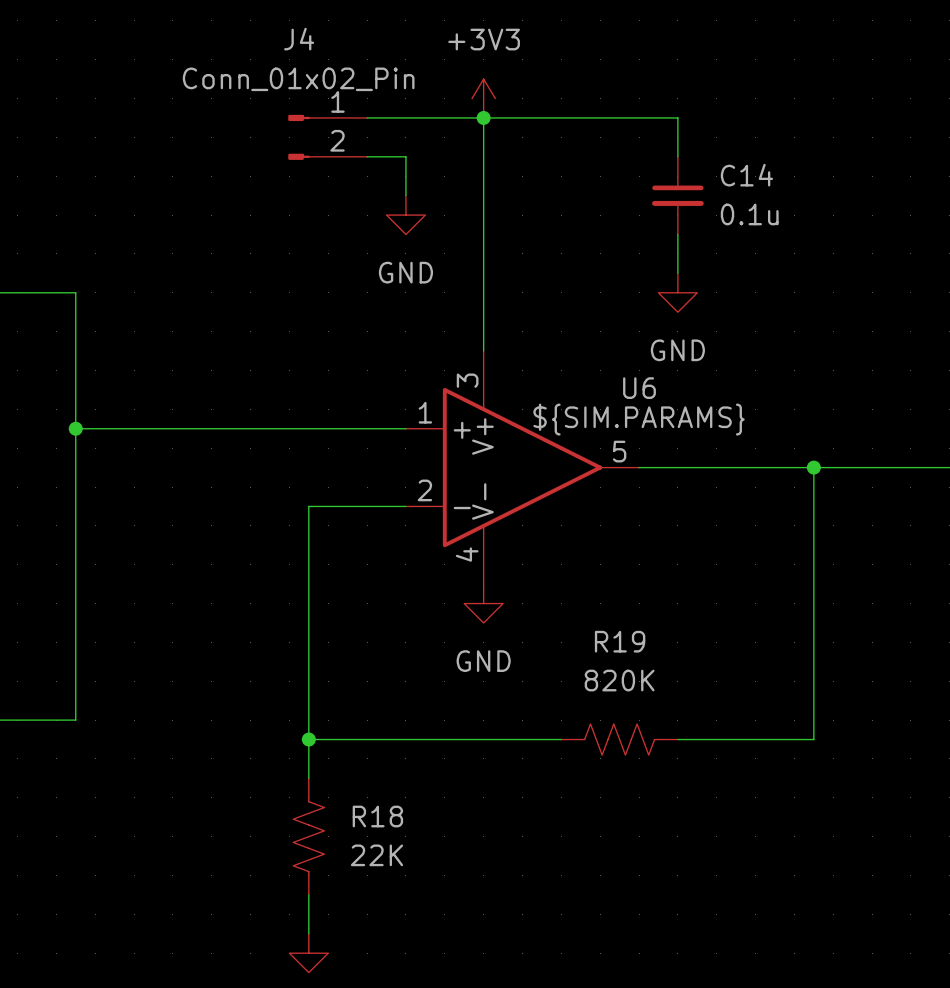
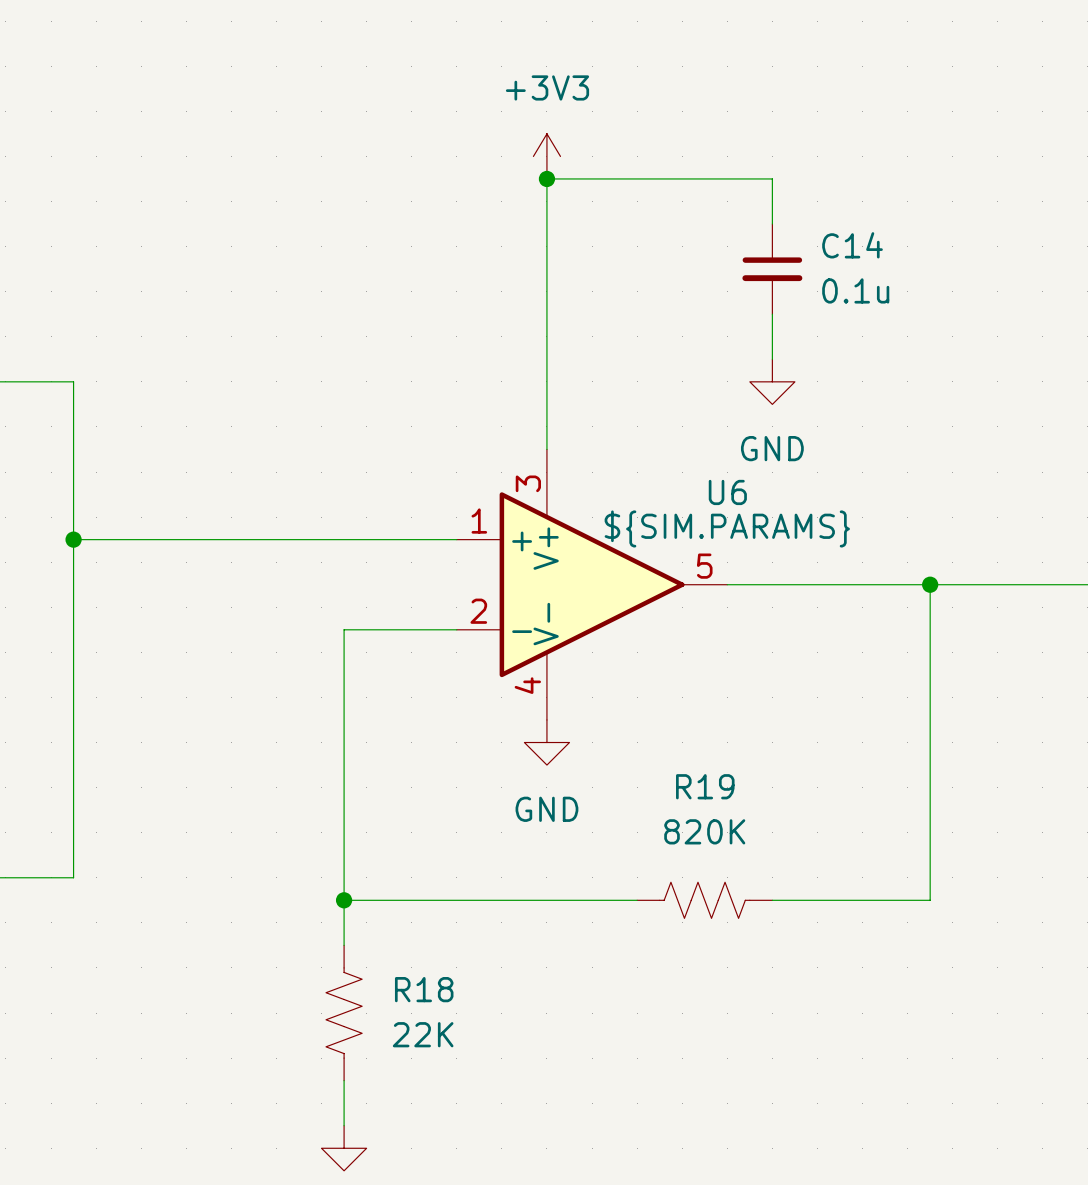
wire: (367, 117) (483, 117) -> none
J4: Conn_01x02_Pin (327, 137) -> none
wire: (367, 156) (405, 156) (405, 195) -> none
power symbol: GND (405, 215) -> none

